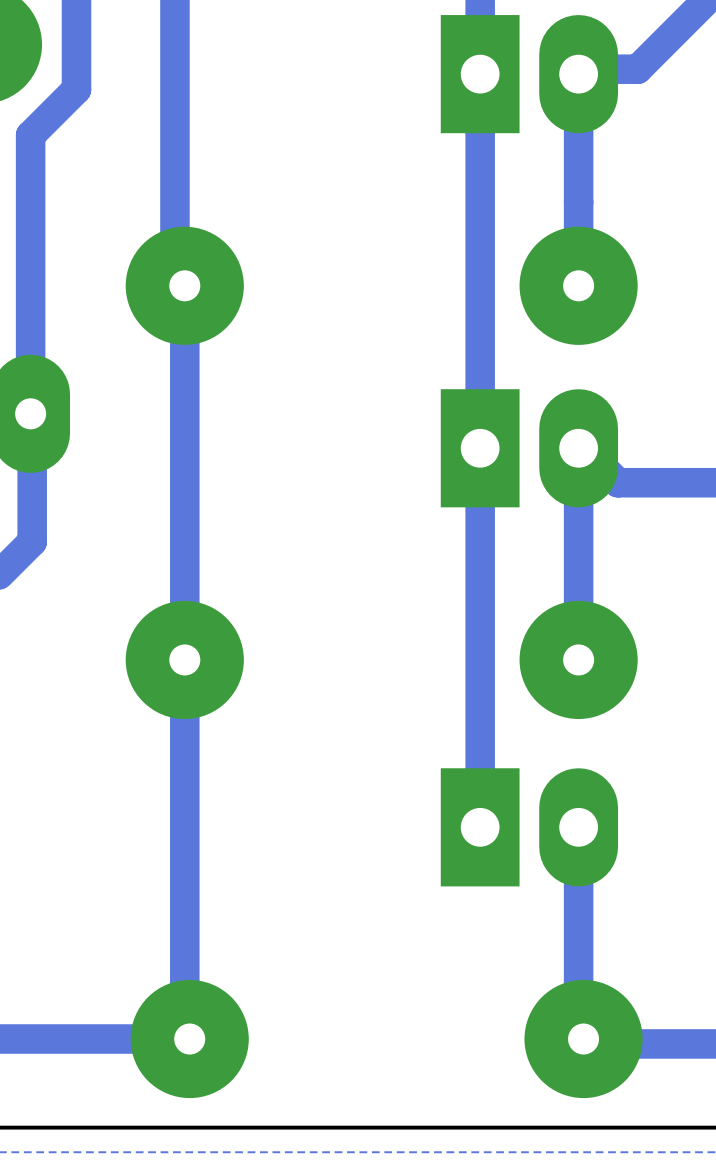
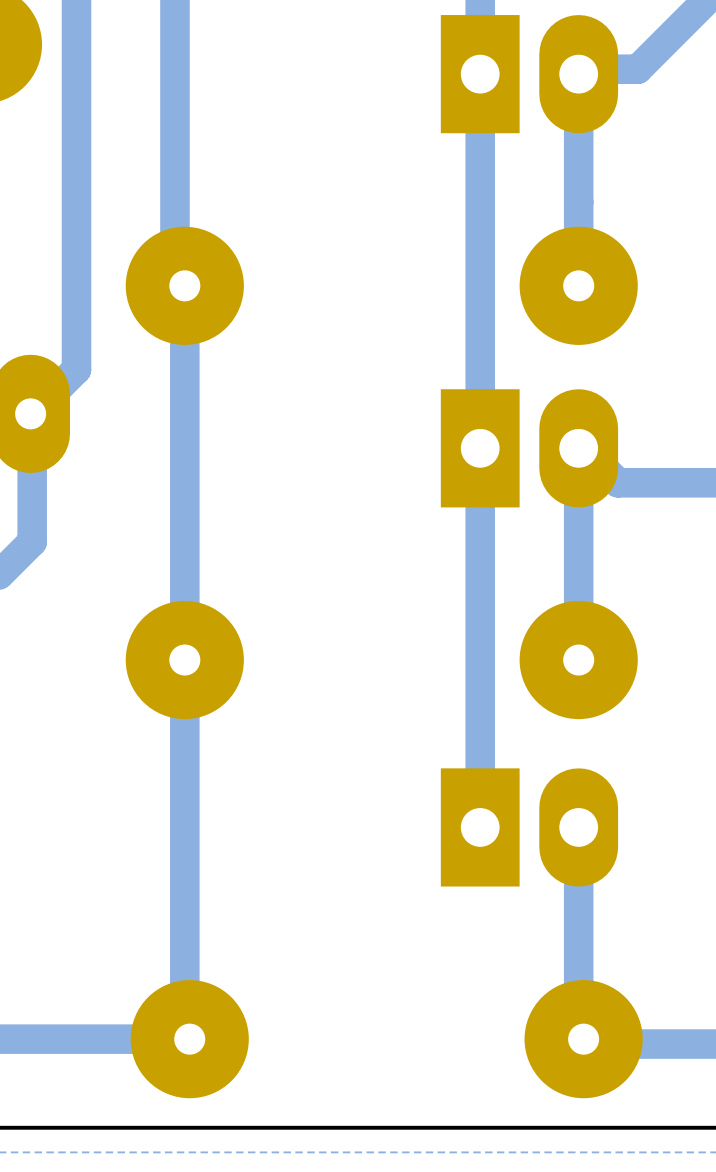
bottom track: (76, 89) (30, 135) (30, 413) -> (76, 89) (76, 369) (32, 413)

